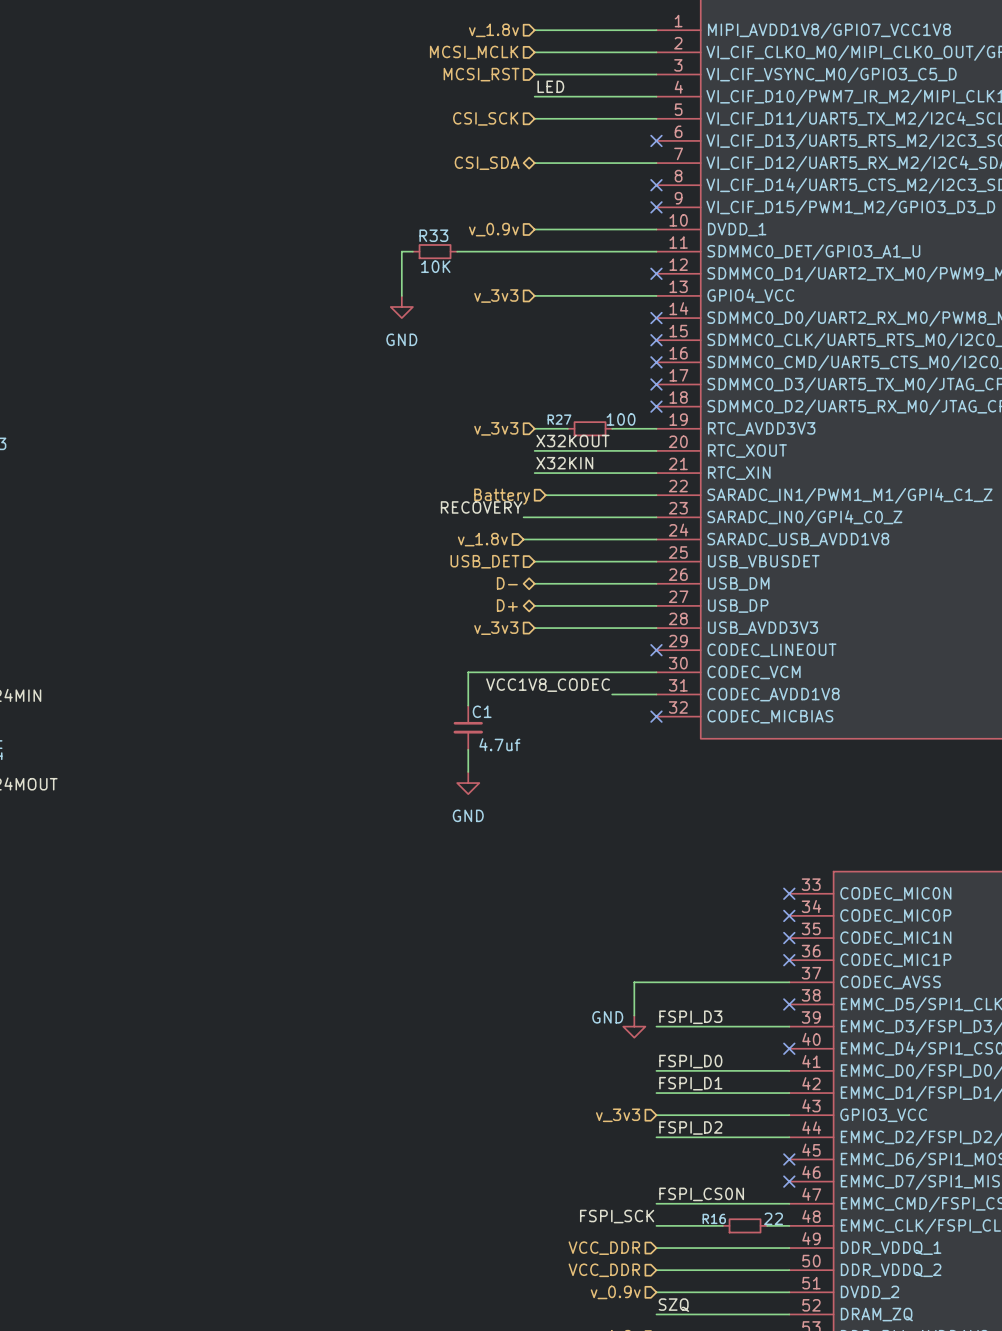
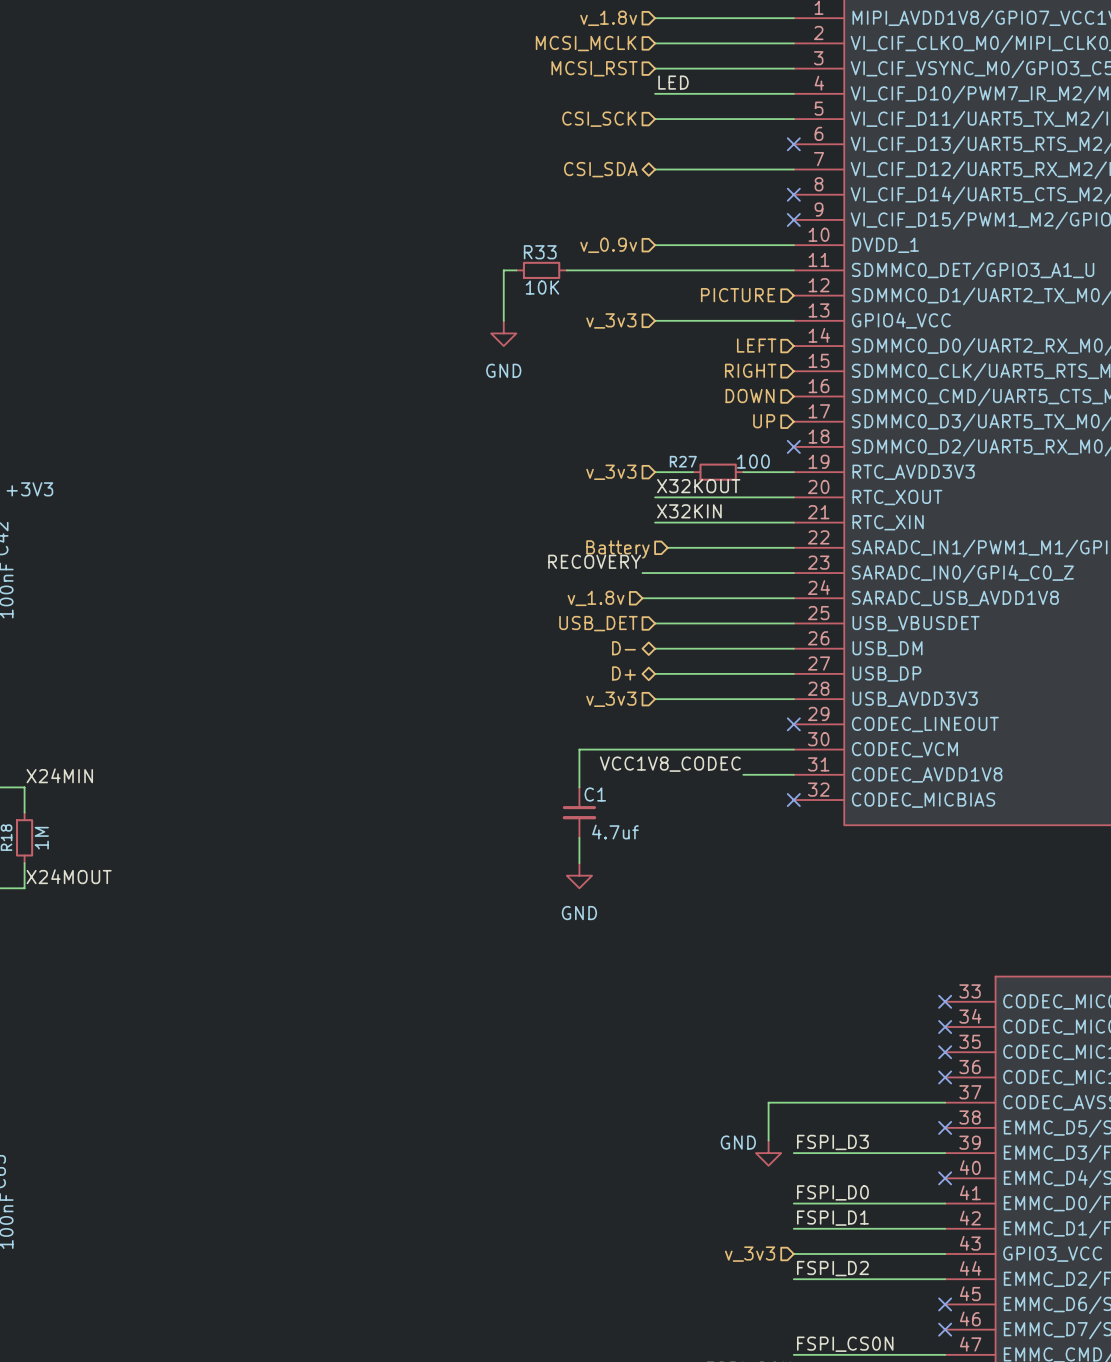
hierarchical label: none -> PICTURE (738, 295)
no-connect mark: (656, 273) -> none
hierarchical label: none -> LEFT (756, 345)
no-connect mark: (656, 318) -> none
hierarchical label: none -> RIGHT (750, 370)
no-connect mark: (656, 340) -> none
hierarchical label: none -> DOWN (750, 396)
no-connect mark: (656, 362) -> none
hierarchical label: none -> UP (764, 421)
no-connect mark: (656, 384) -> none

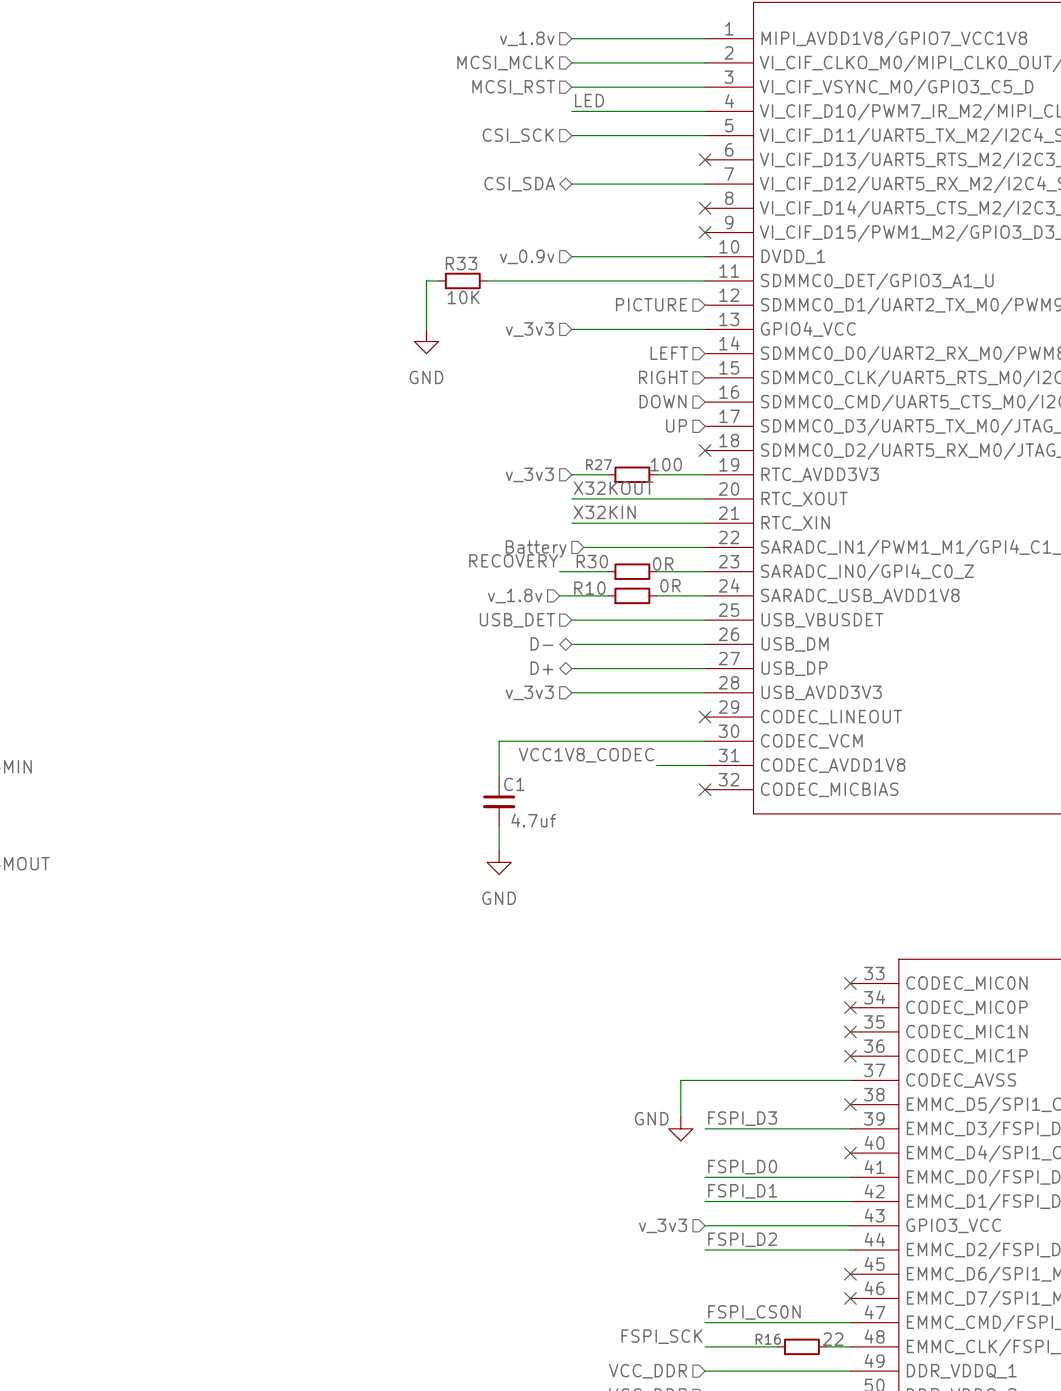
wire: (692, 573) (743, 573) -> none
R30: none -> 0R (632, 571)
wire: (692, 598) (743, 598) -> none
R10: none -> 0R (632, 595)

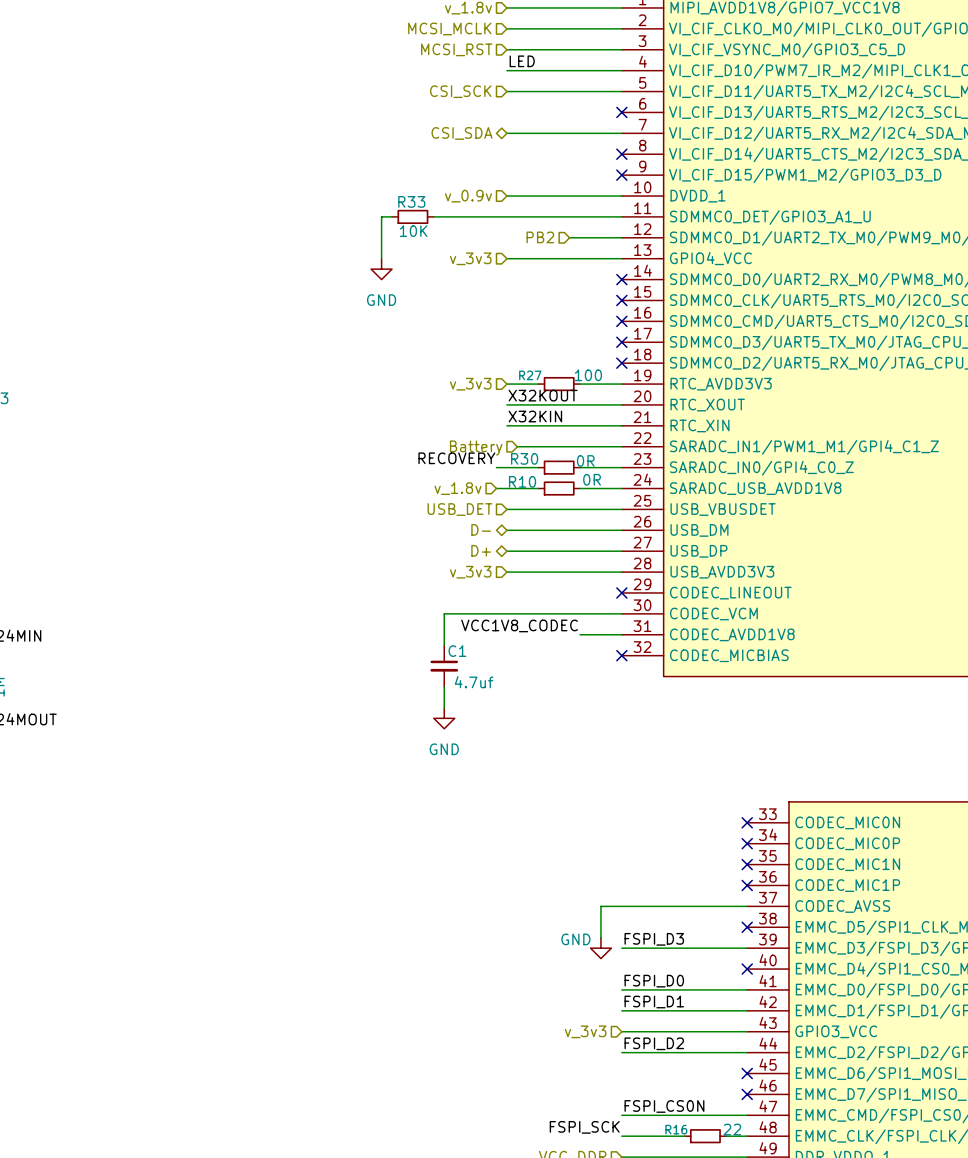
hierarchical label: none -> PB2 (540, 237)
hierarchical label: PICTURE (651, 304) -> none
wire: none -> (569, 237) (621, 237)
hierarchical label: LEFT (669, 353) -> none
no-connect mark: none -> (621, 279)
hierarchical label: RIGHT (663, 377) -> none
no-connect mark: none -> (621, 300)
hierarchical label: DOWN (663, 401) -> none
no-connect mark: none -> (621, 321)
hierarchical label: UP (676, 425) -> none
no-connect mark: none -> (621, 342)

